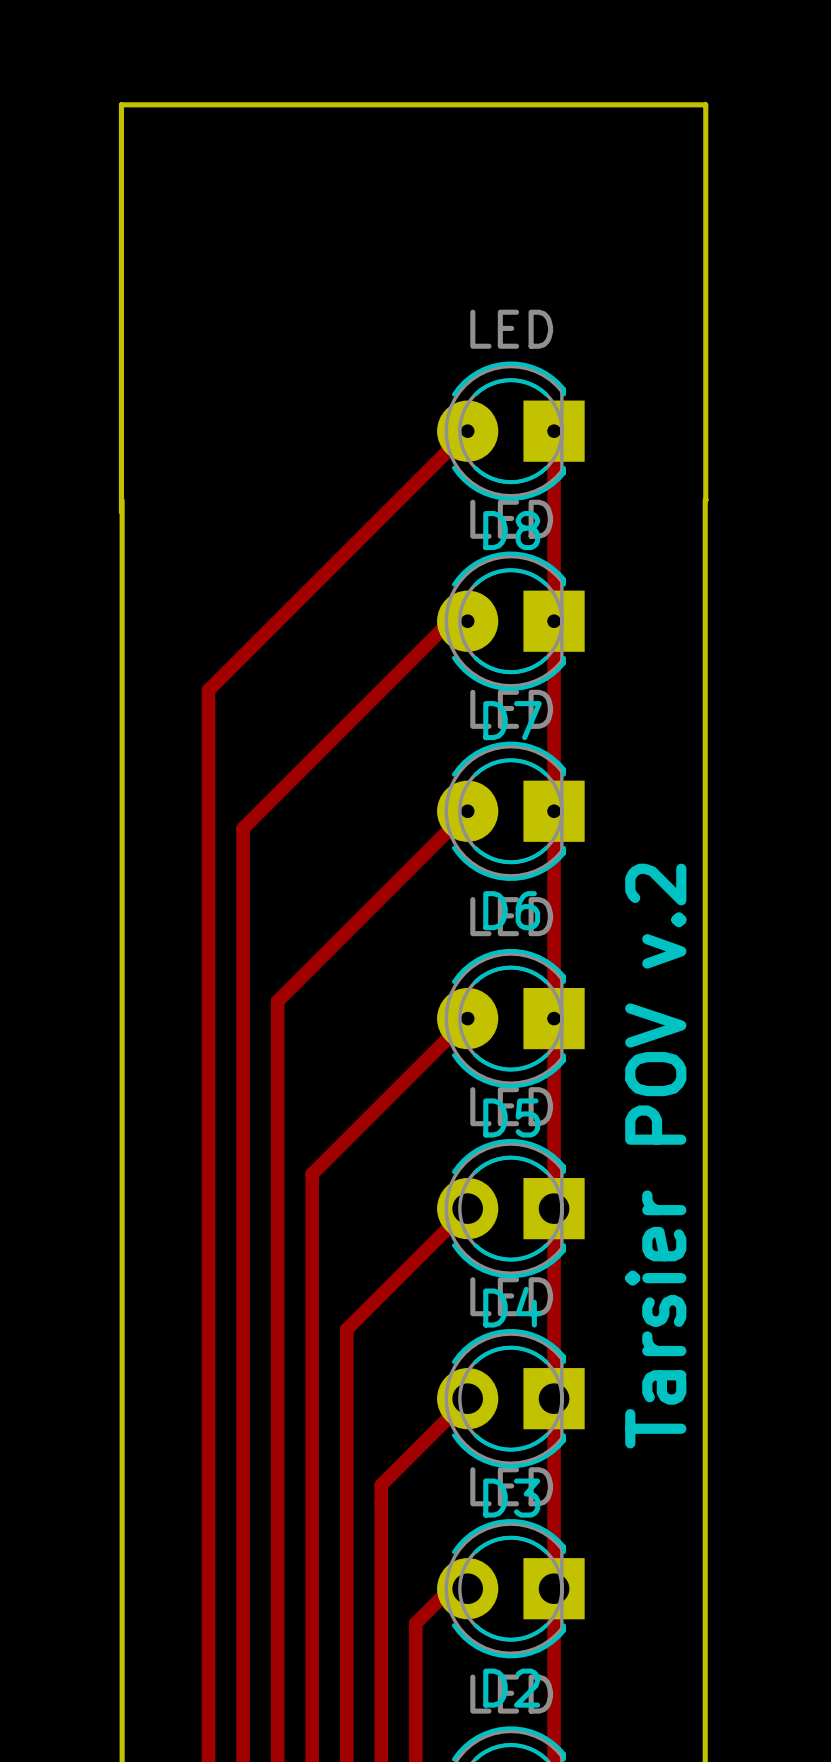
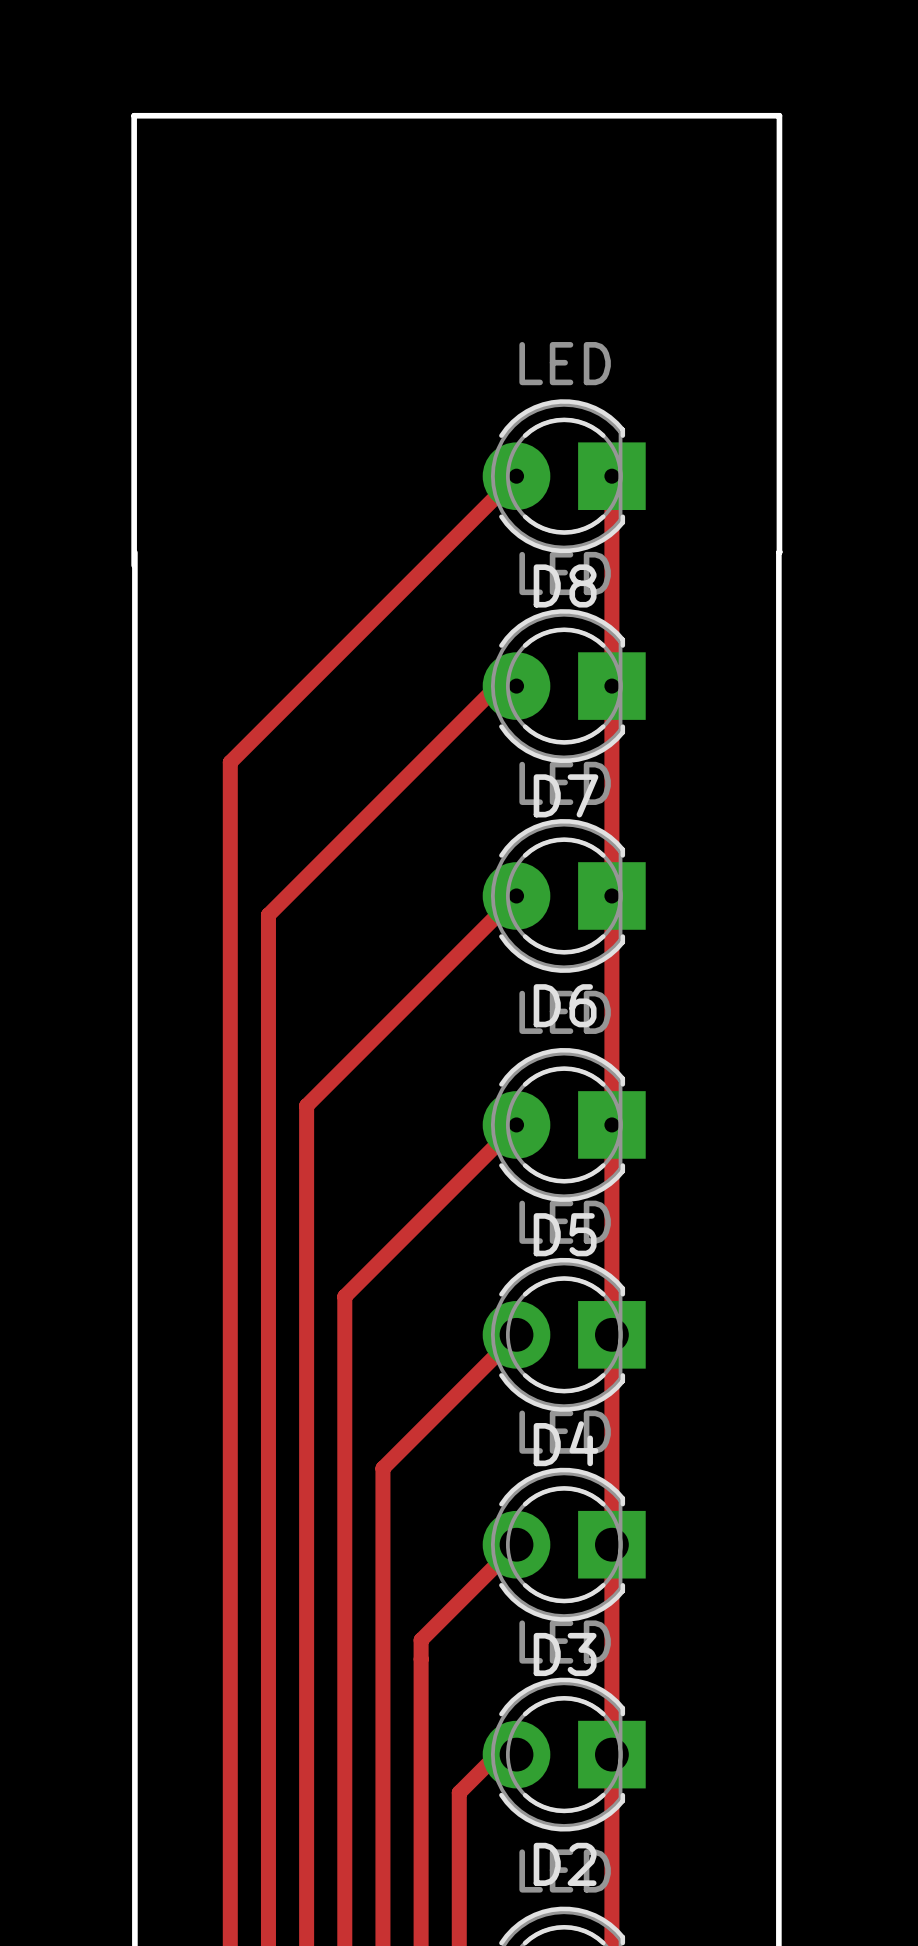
text: v.2 (655, 916) -> none
text: Tarsier POV (655, 1225) -> none

